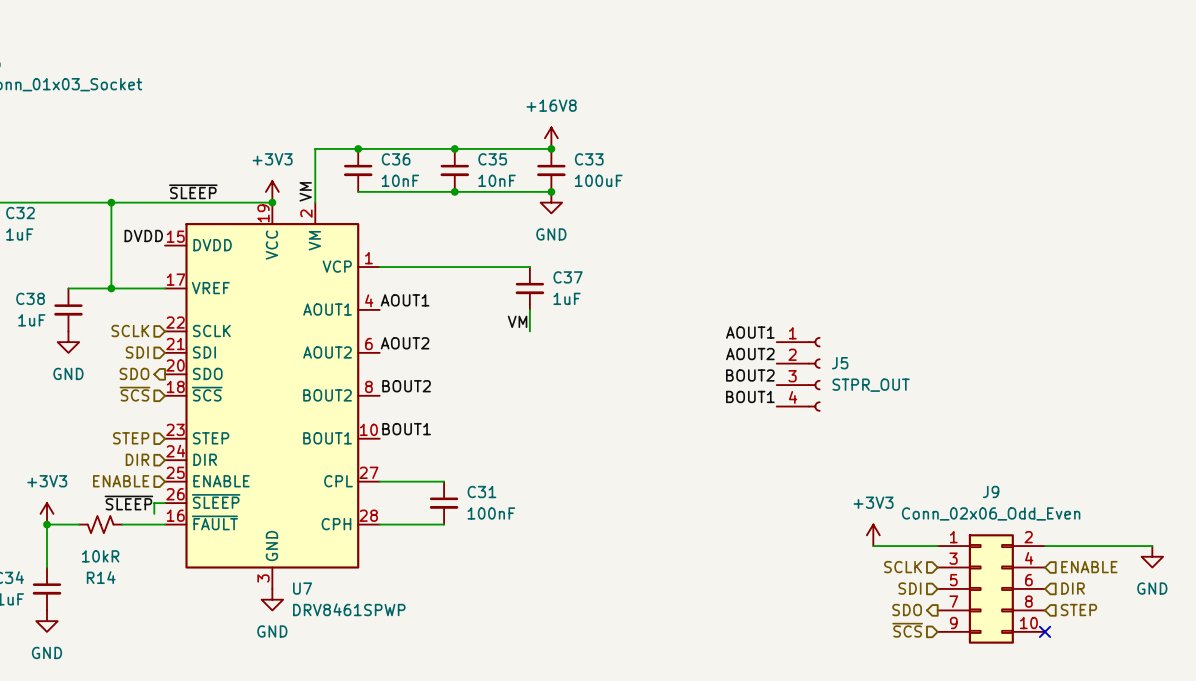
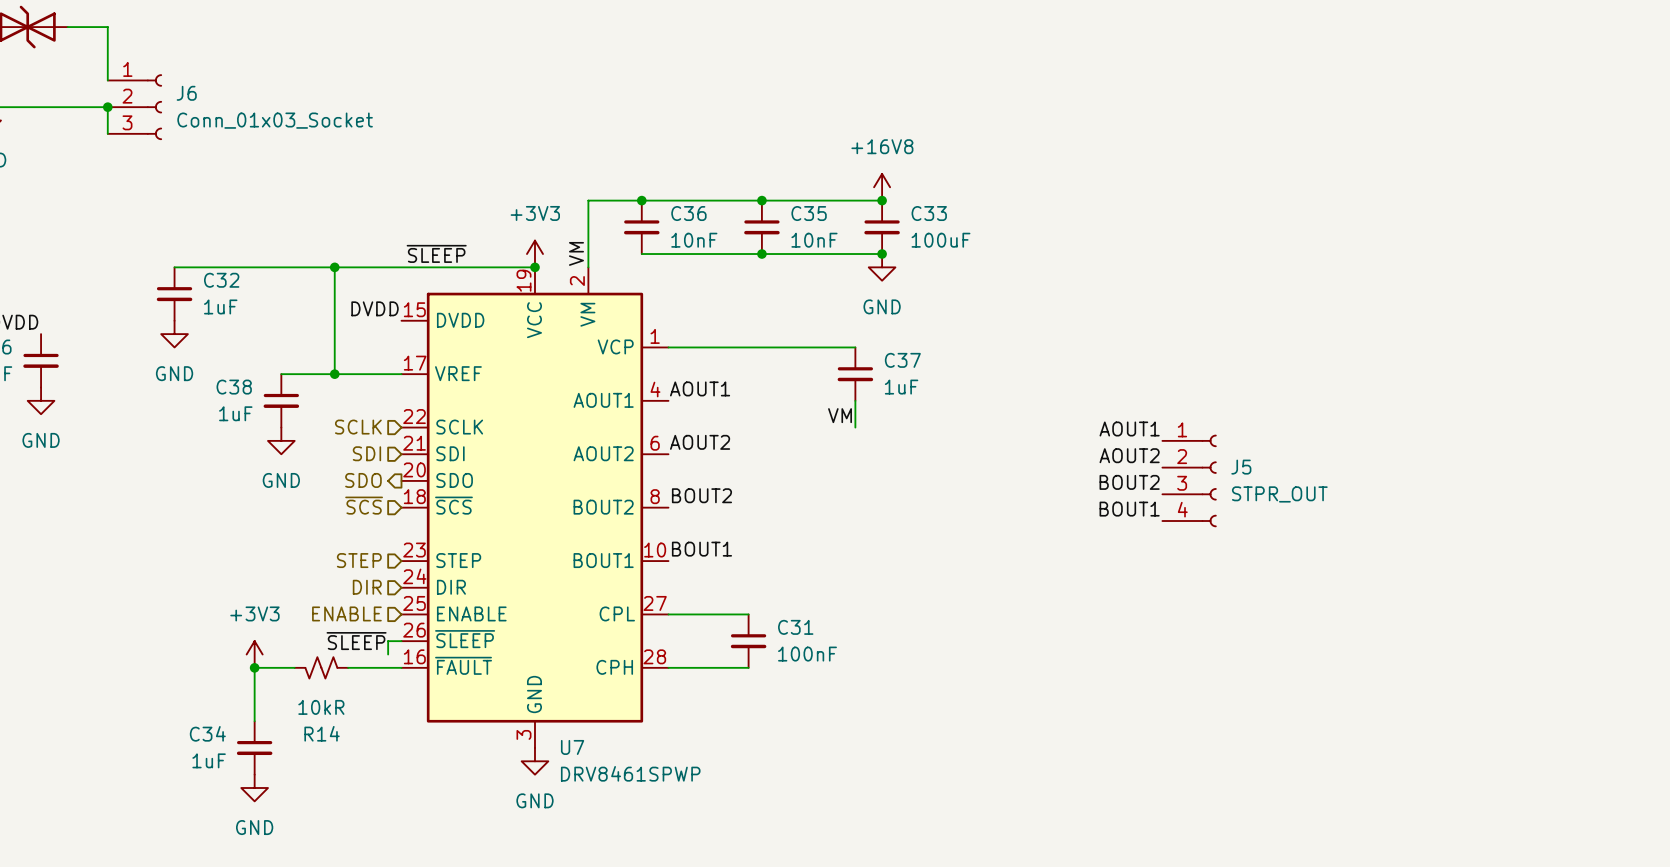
power symbol: +3V3 (873, 535) -> none
wire: (873, 546) (937, 546) -> none
wire: (1045, 546) (1152, 546) -> none
power symbol: GND (1152, 556) -> none
hierarchical label: SCLK (903, 567) -> none
hierarchical label: ENABLE (1089, 567) -> none
hierarchical label: SDI (909, 588) -> none
J9: Conn_02x06_Odd_Even (991, 588) -> none
hierarchical label: DIR (1073, 588) -> none
hierarchical label: SDO (907, 610) -> none
hierarchical label: STEP (1078, 610) -> none
hierarchical label: ~{SCS} (907, 630) -> none
no-connect mark: (1045, 631) -> none

